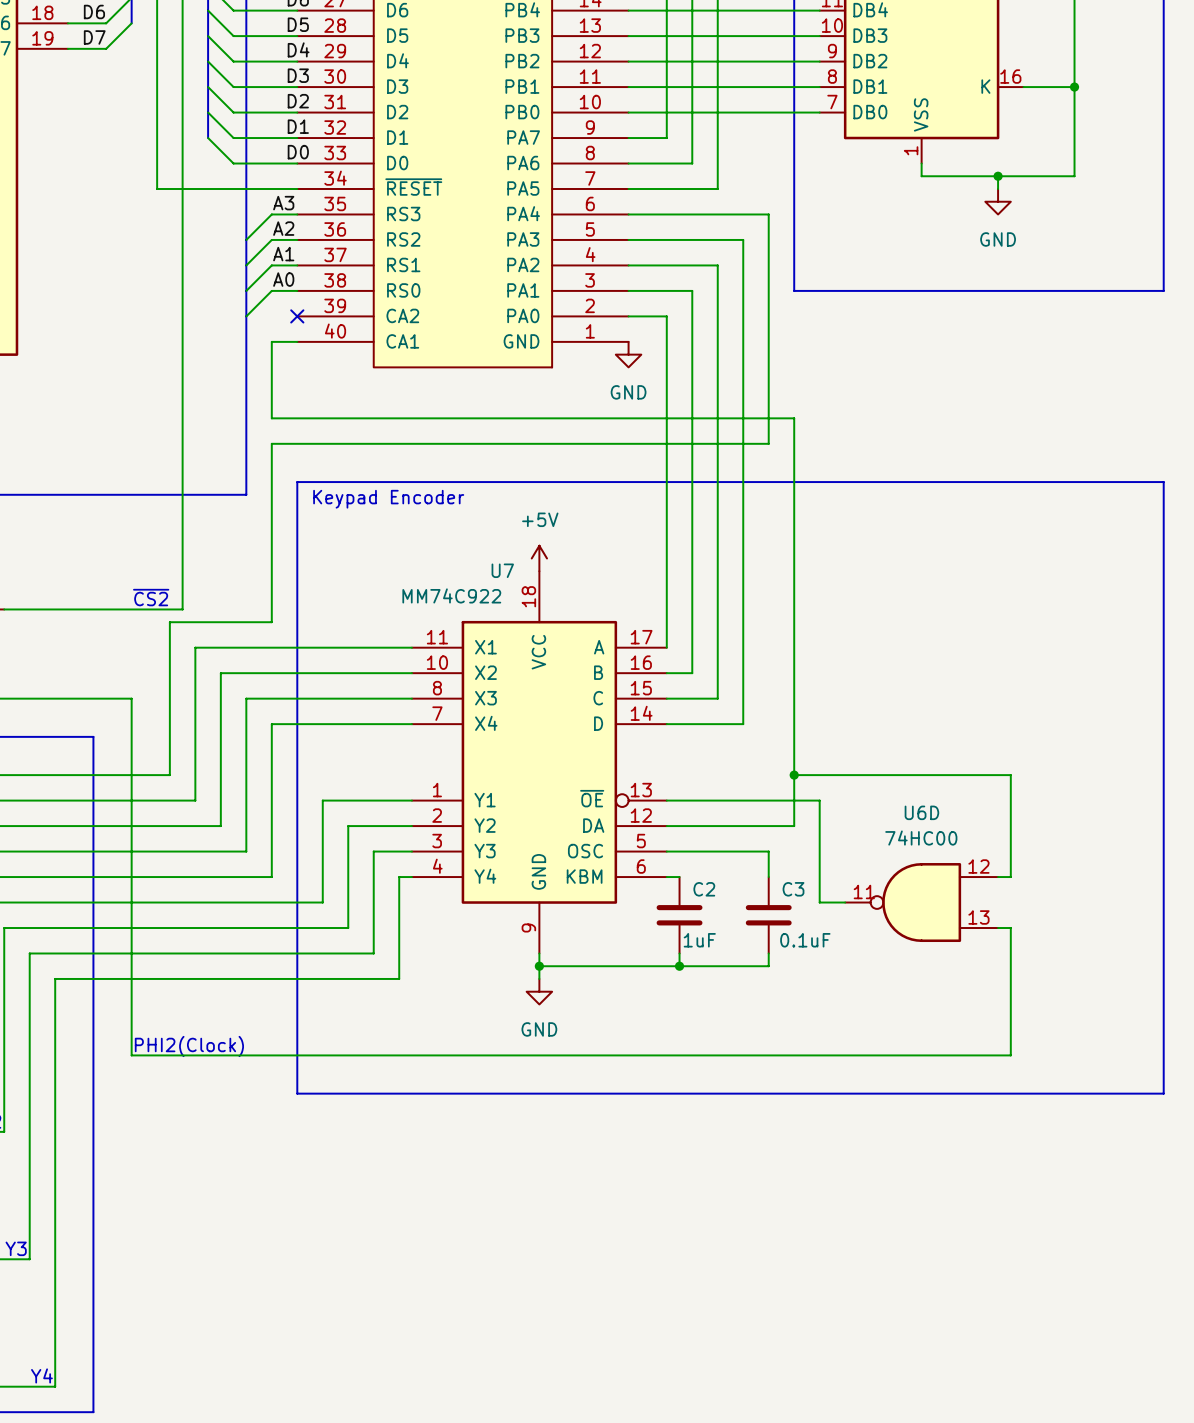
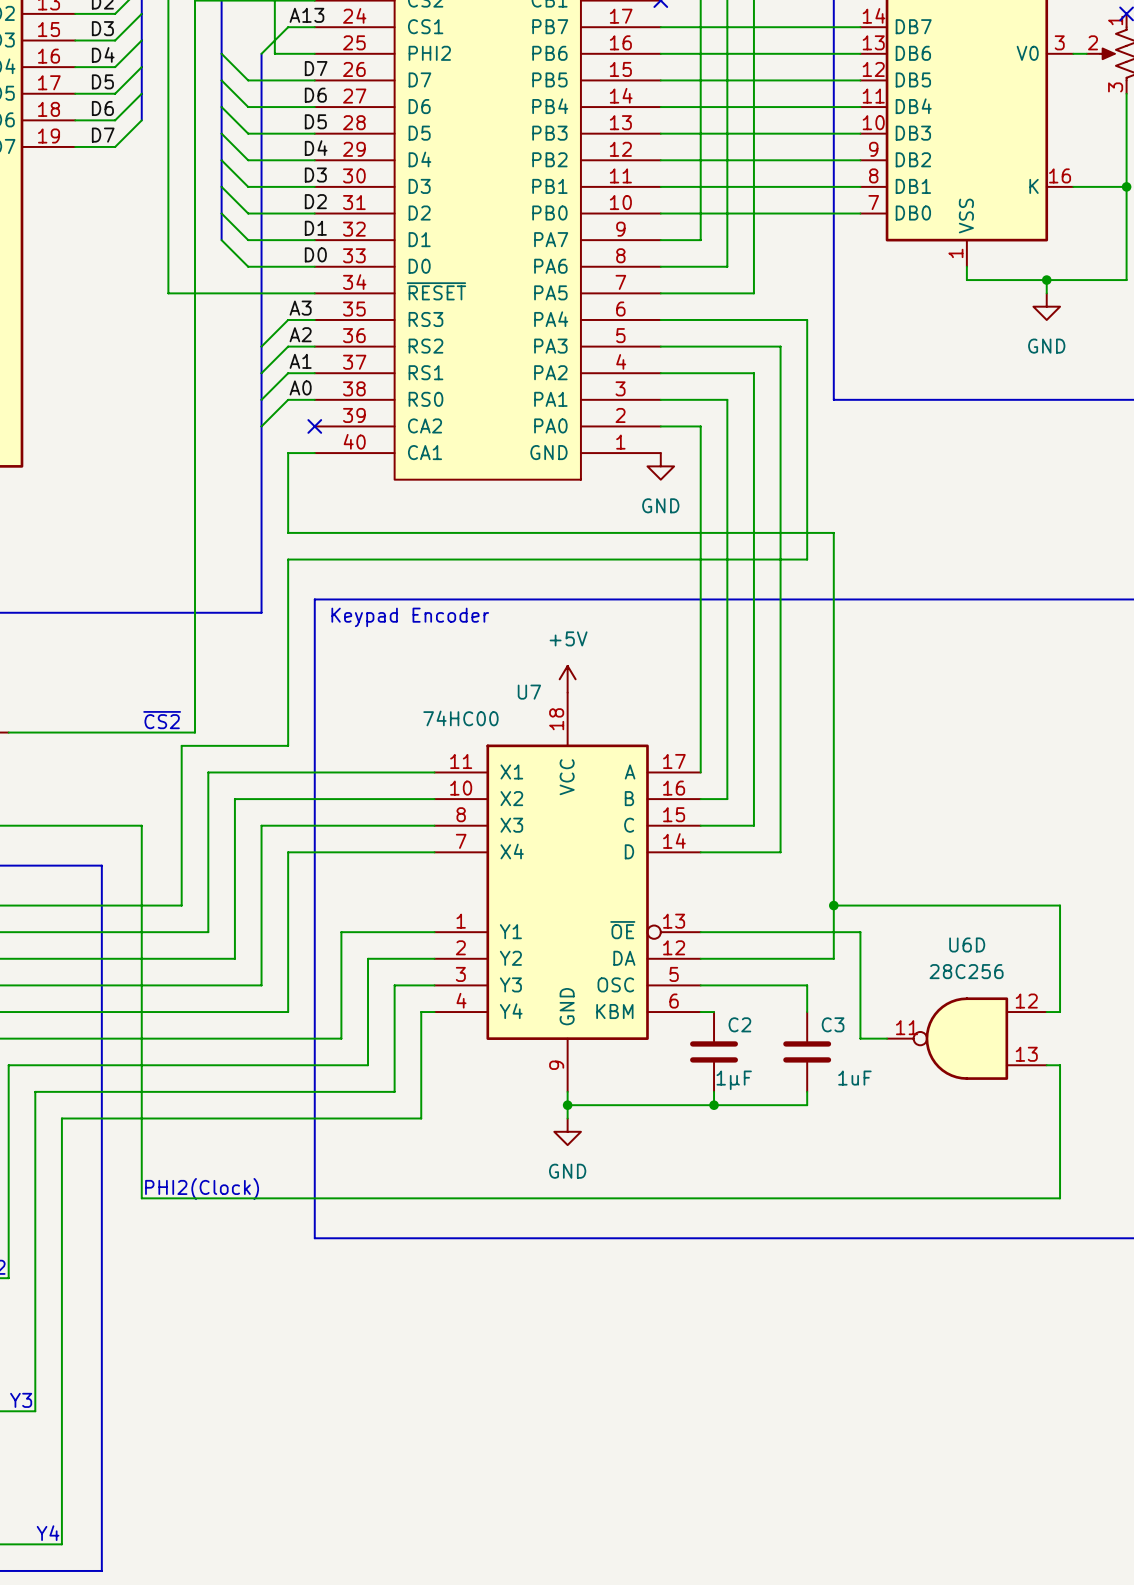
U7 value: MM74C922 (451, 595) -> 74HC00 (460, 718)
U6D value: 74HC00 (921, 838) -> 28C256 (966, 971)
C2 value: 1uF (699, 940) -> 1µF (734, 1080)
C3 value: 0.1uF (805, 940) -> 1uF (854, 1078)

